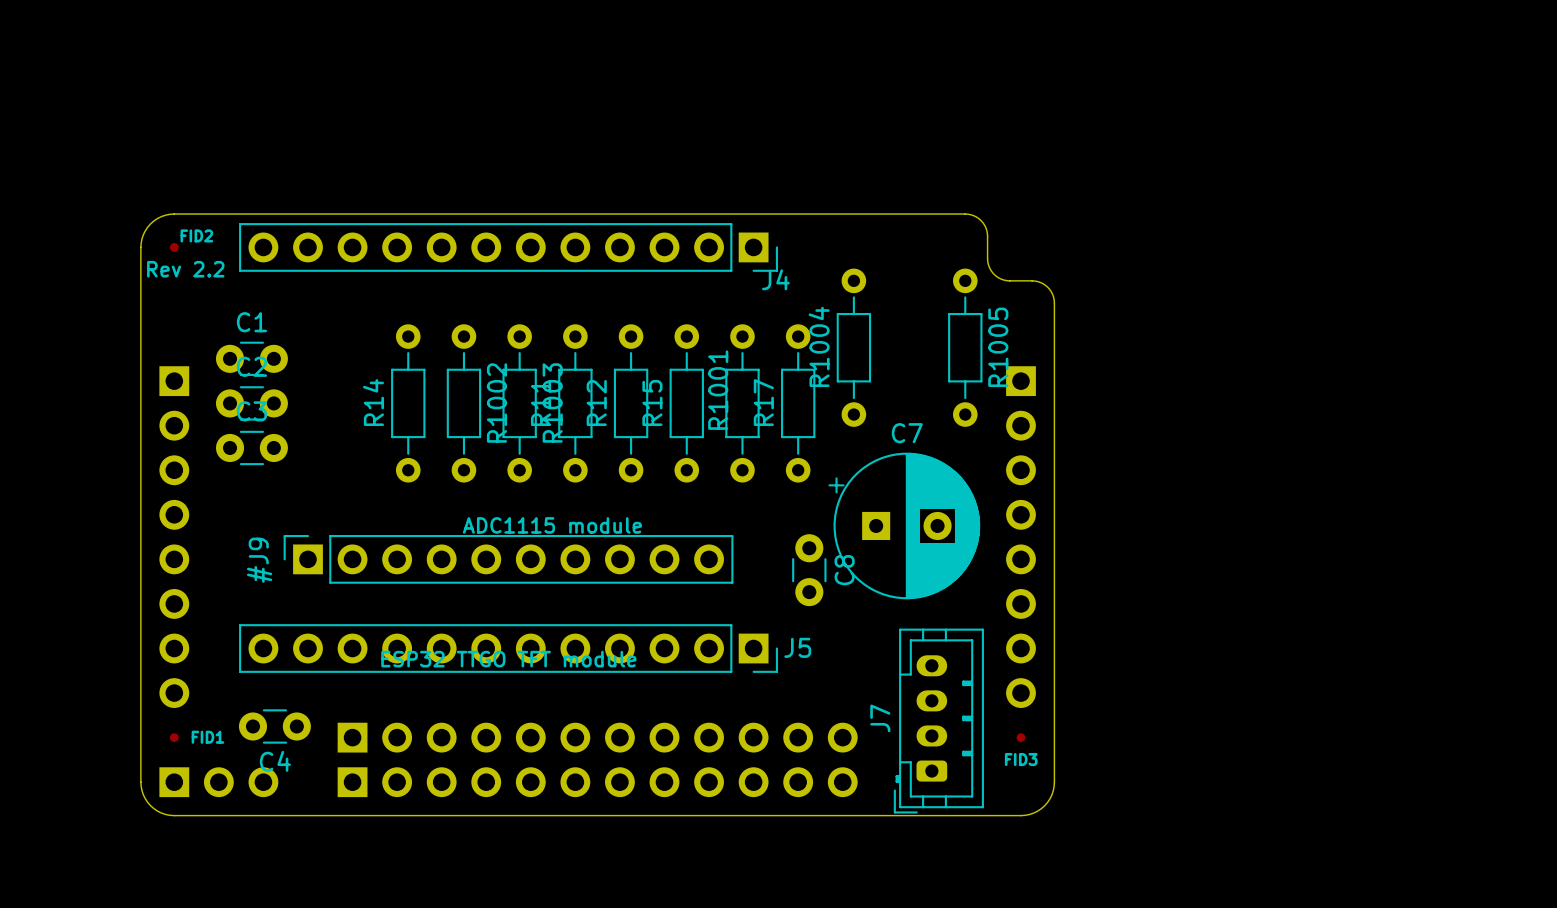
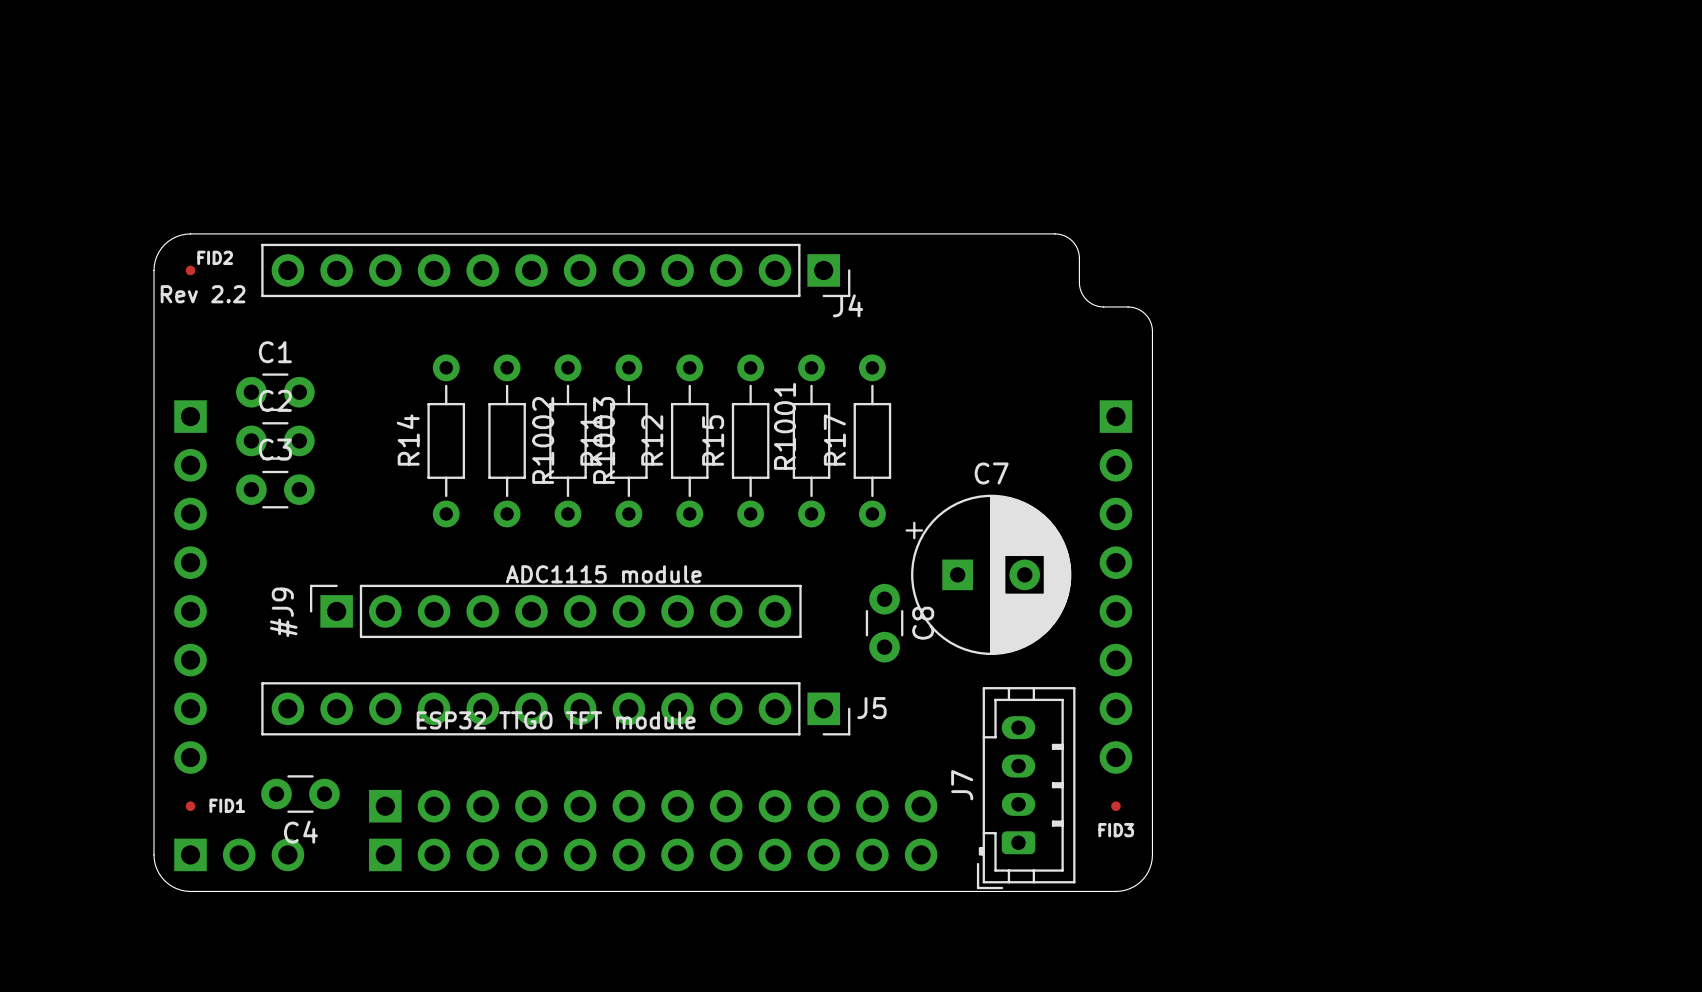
R1004: (853, 347) -> none
R1005: (965, 347) -> none

